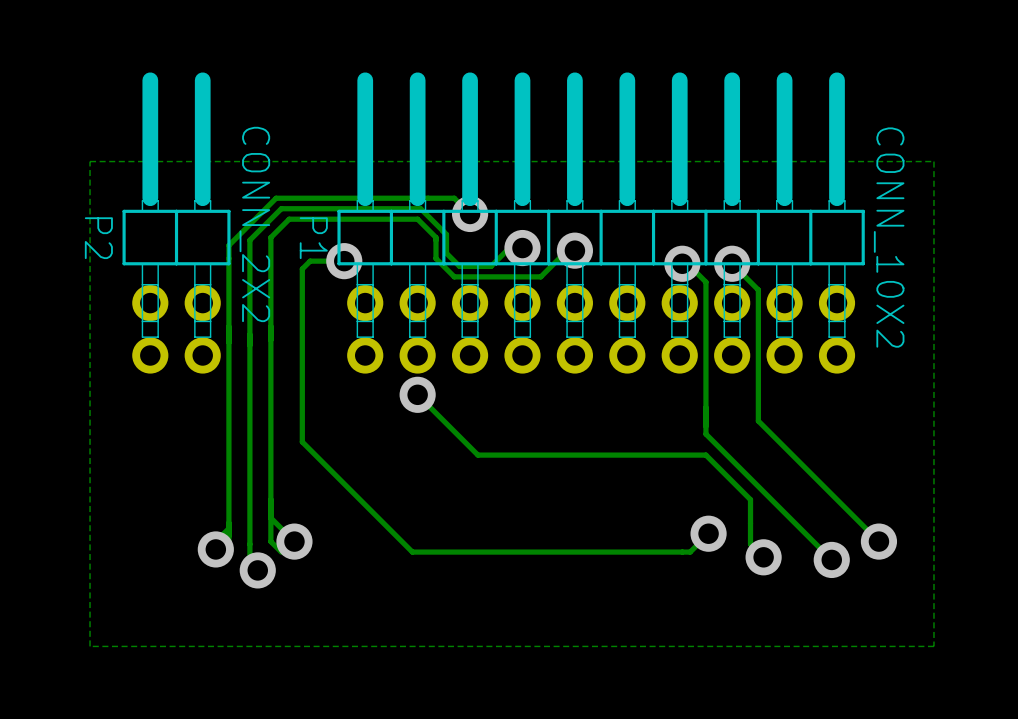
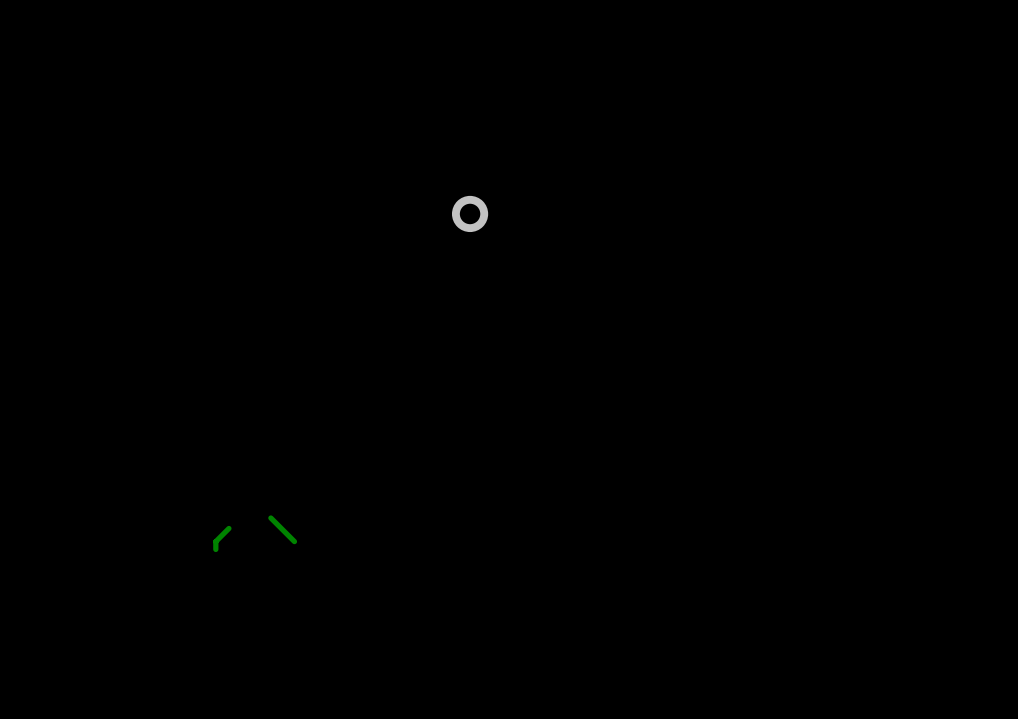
zone outline: (933, 161) (90, 161) (90, 646) (933, 646) (933, 161) -> none
track: (470, 213) (454, 198) (276, 198) (228, 245) (228, 544) -> none
P2: CONN_2X2 (176, 223) -> none
P1: CONN_10X2 (601, 223) -> none
track: (522, 248) (509, 248) (491, 266) (459, 266) (446, 253) (446, 234) (420, 208) (281, 208) (249, 240) (249, 562) (257, 570) -> none
via: (522, 248) -> none
track: (574, 250) (567, 250) (540, 276) (454, 276) (435, 258) (435, 237) (417, 219) (289, 219) (270, 237) (270, 541) (281, 552) -> none
via: (574, 250) -> none
track: (344, 261) (310, 261) (302, 269) (302, 441) (412, 552) (690, 552) (708, 533) -> none
via: (344, 261) -> none
track: (682, 263) (690, 271) (695, 271) (705, 282) (705, 434) (831, 559) -> none
via: (682, 263) -> none
track: (732, 263) (758, 289) (758, 421) (878, 541) -> none
via: (732, 263) -> none
track: (417, 394) (477, 455) (705, 455) (750, 499) (750, 544) (763, 557) -> none
via: (417, 394) -> none
via: (708, 533) -> none
via: (294, 541) -> none
via: (878, 541) -> none
via: (215, 549) -> none
via: (763, 557) -> none
via: (831, 559) -> none
via: (257, 570) -> none

